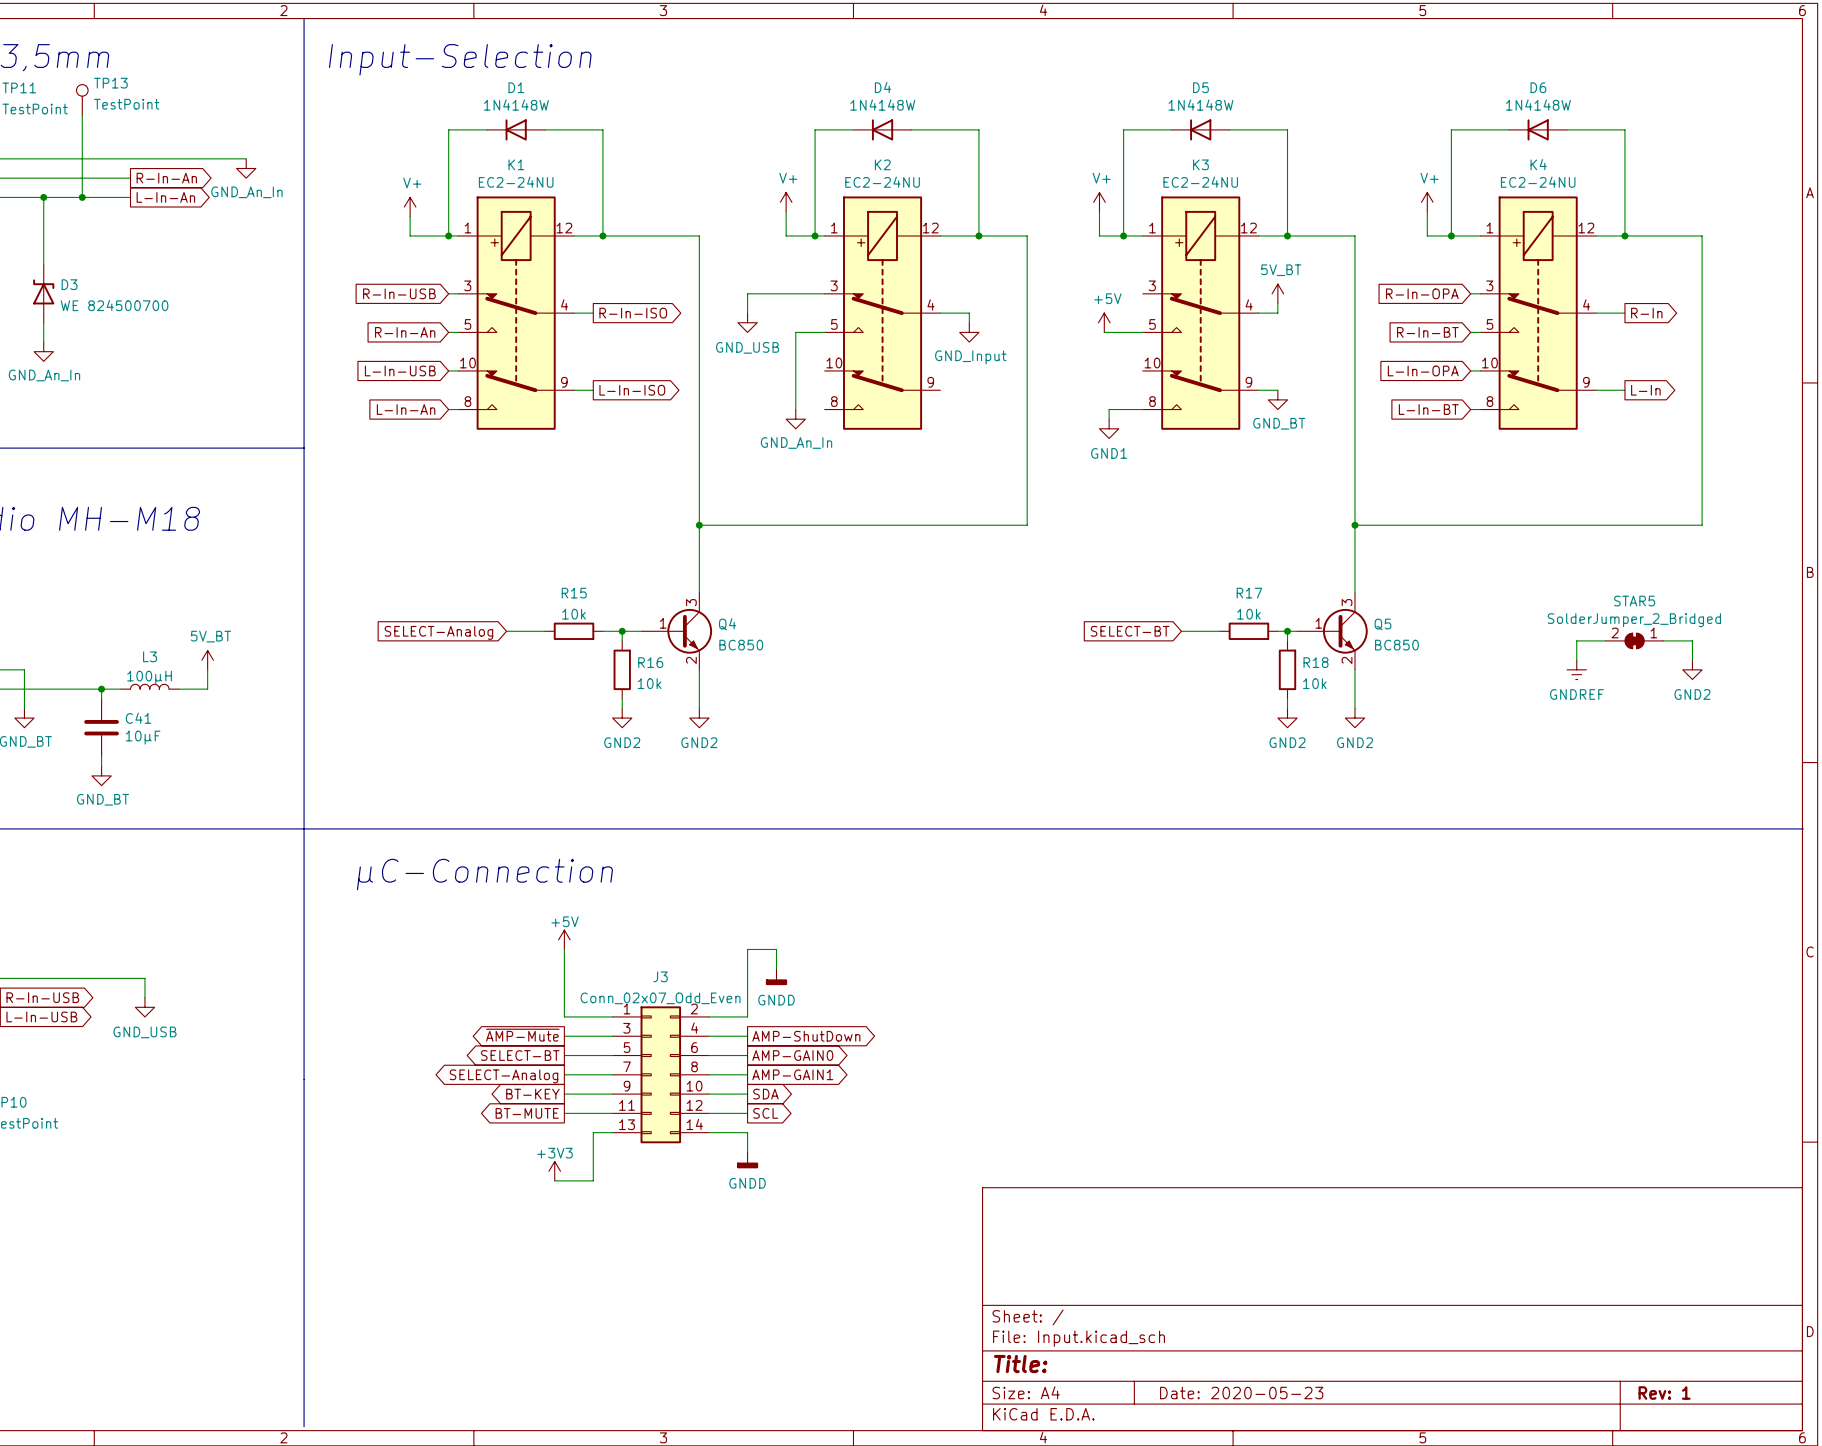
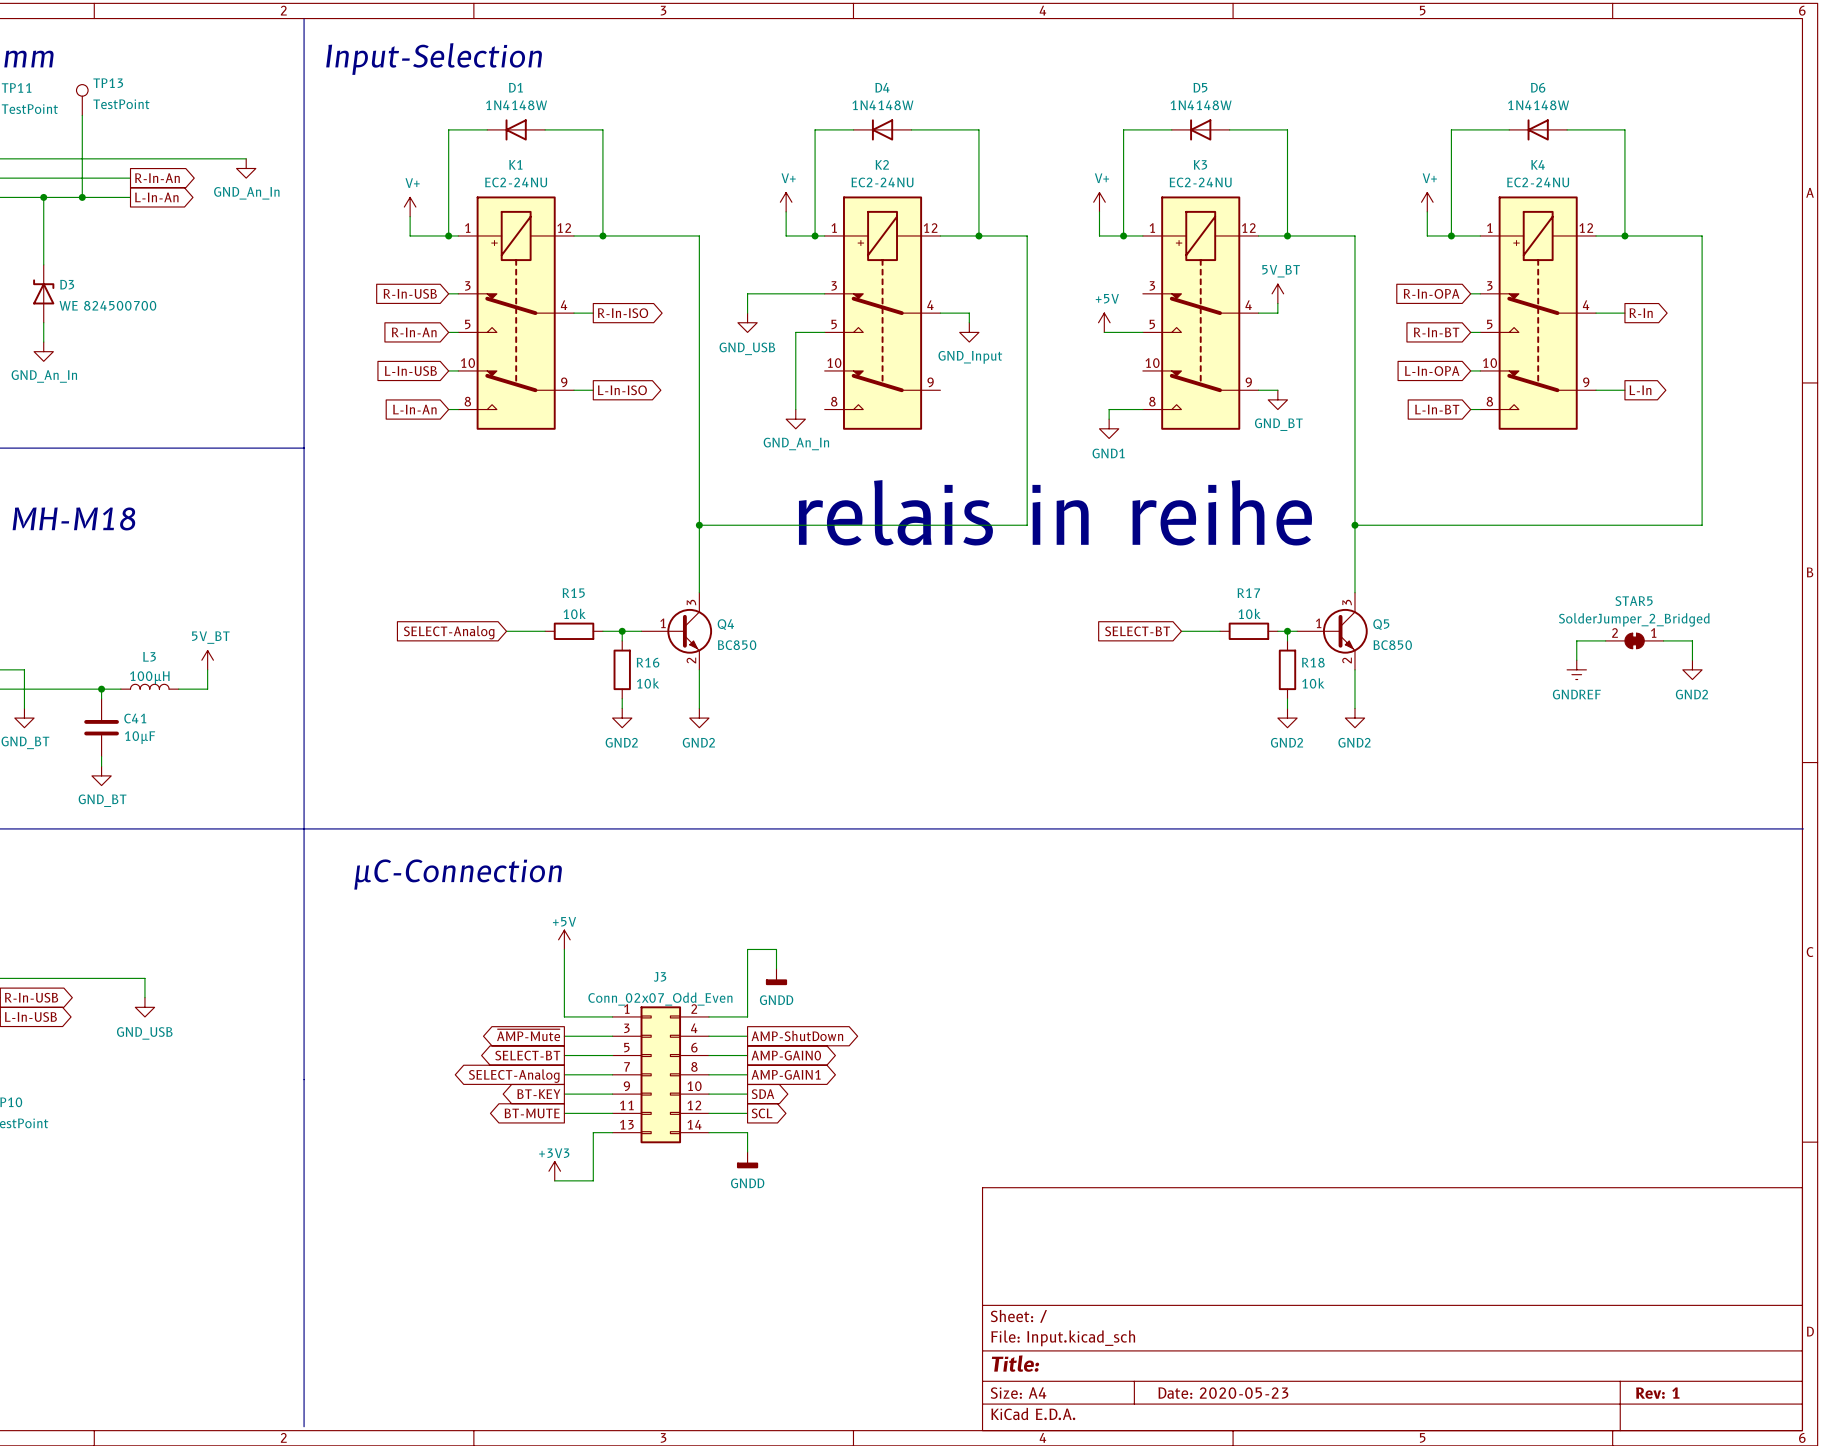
text: none -> relais in reihe (1055, 512)

